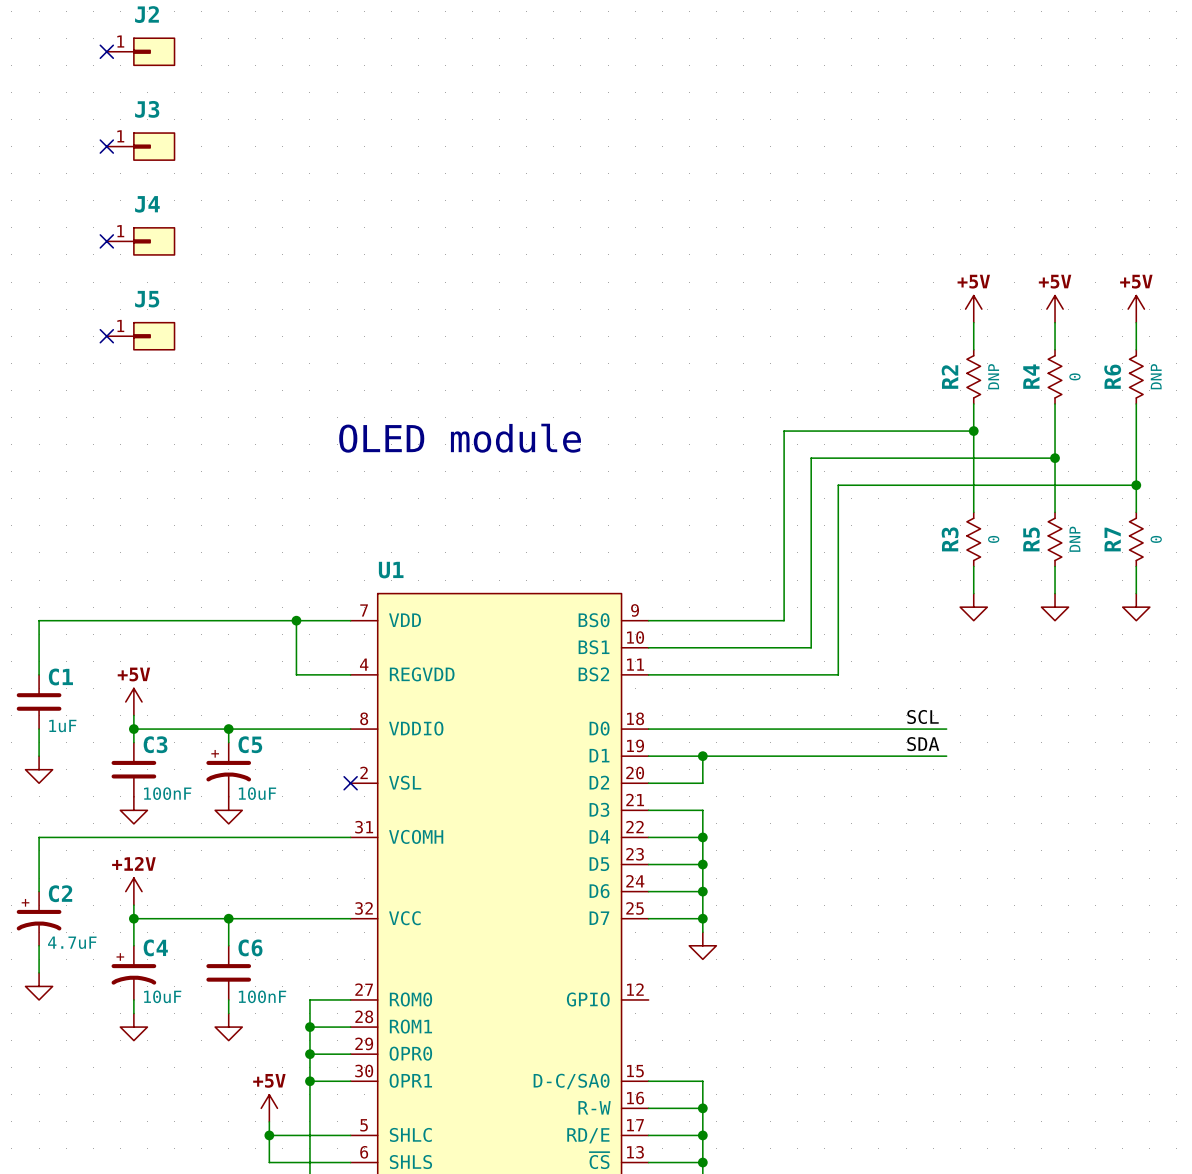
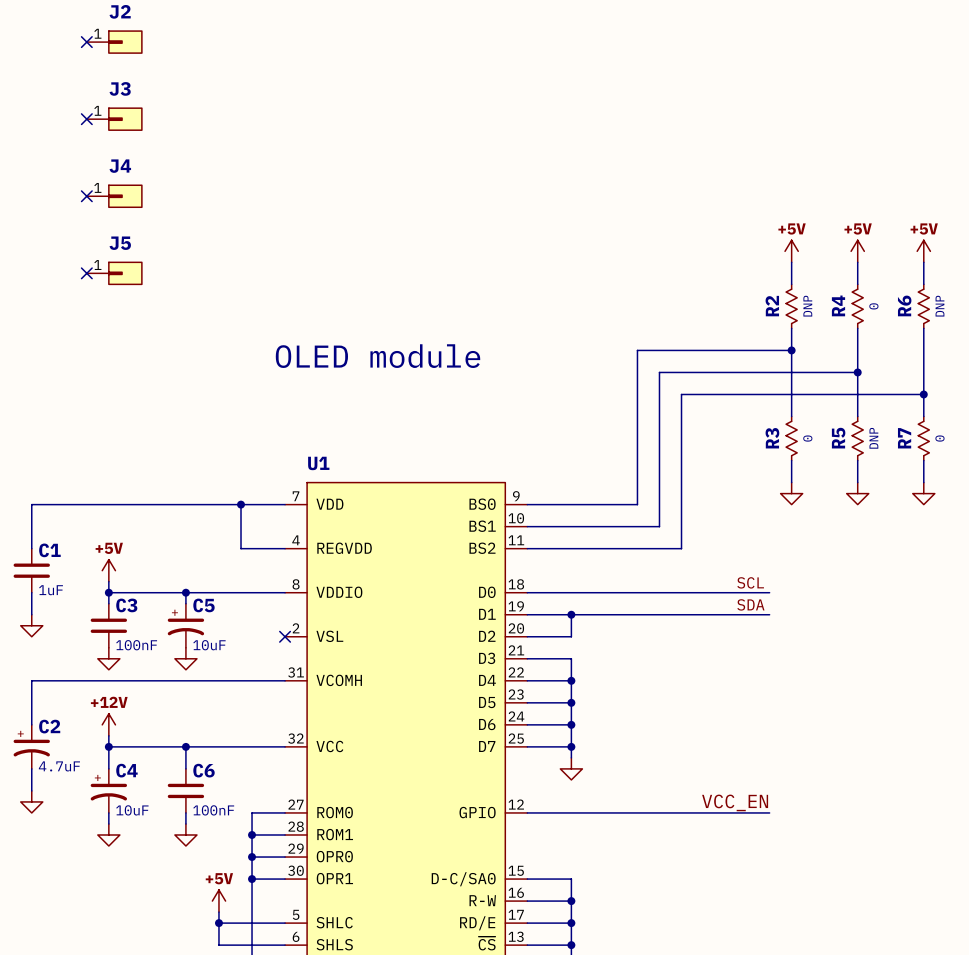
label: none -> VCC_EN (735, 802)
wire: none -> (527, 812) (769, 812)

